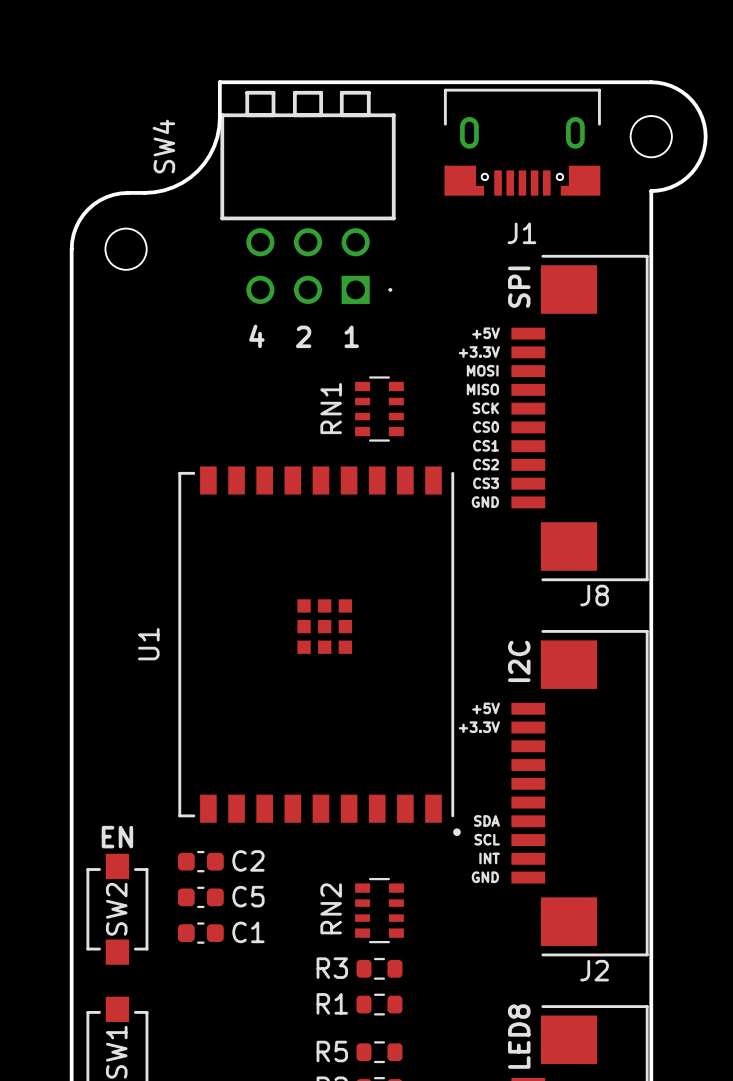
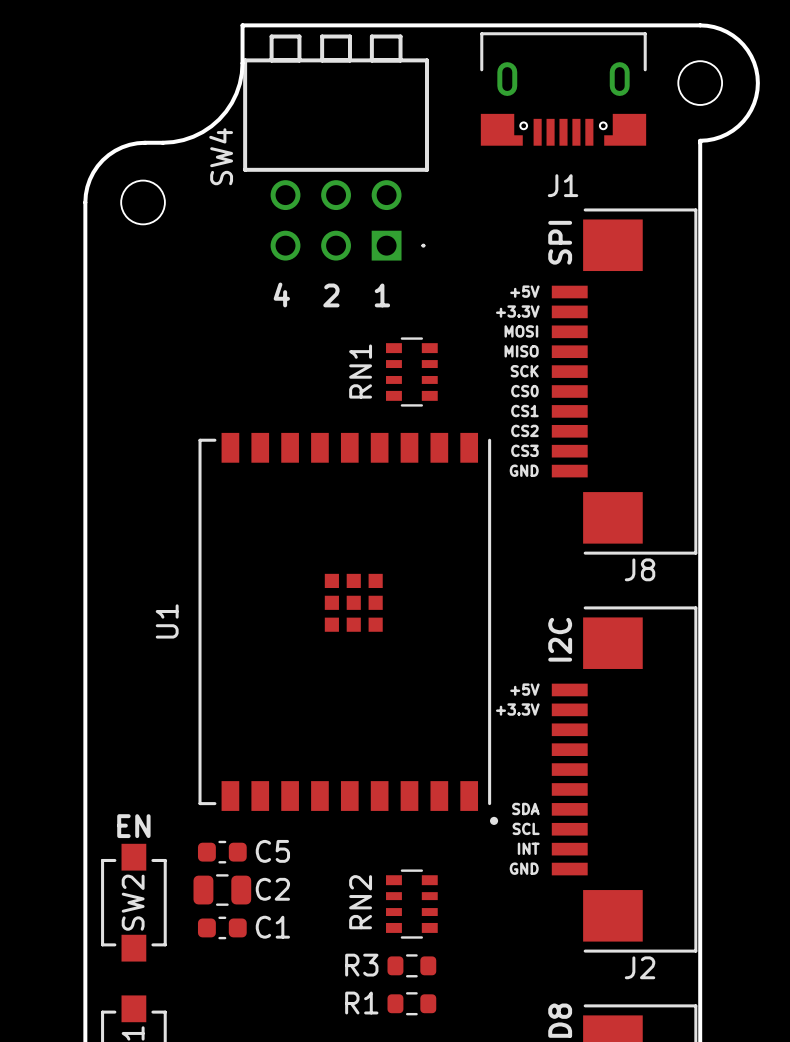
SW4 name position: SW4 (163, 146) -> SW4 (221, 156)
C2 name: C2 (248, 860) -> C5 (272, 851)
C5: (200, 897) -> none
C2: none -> (222, 890)

